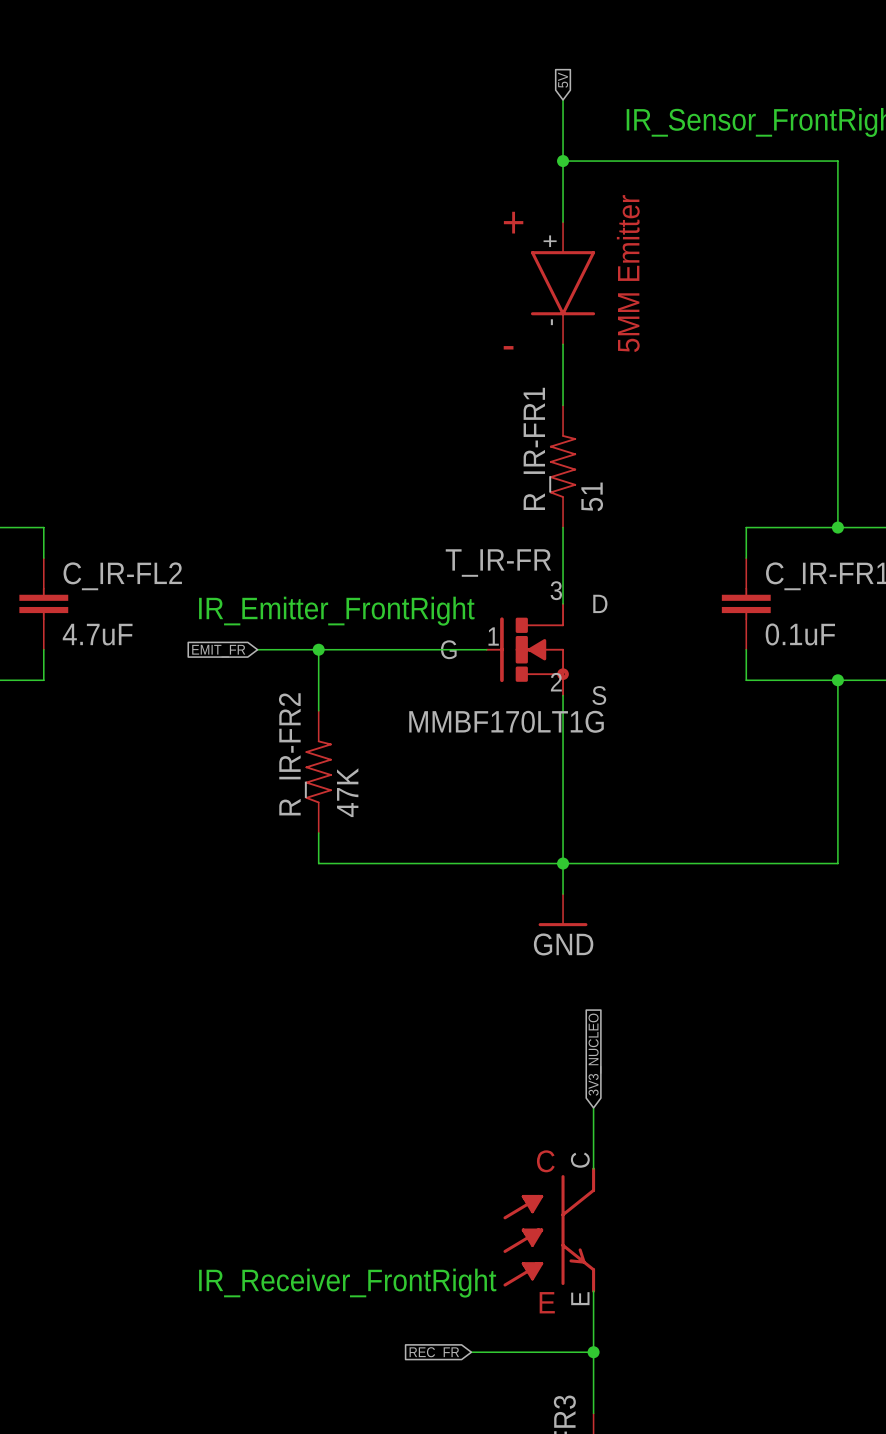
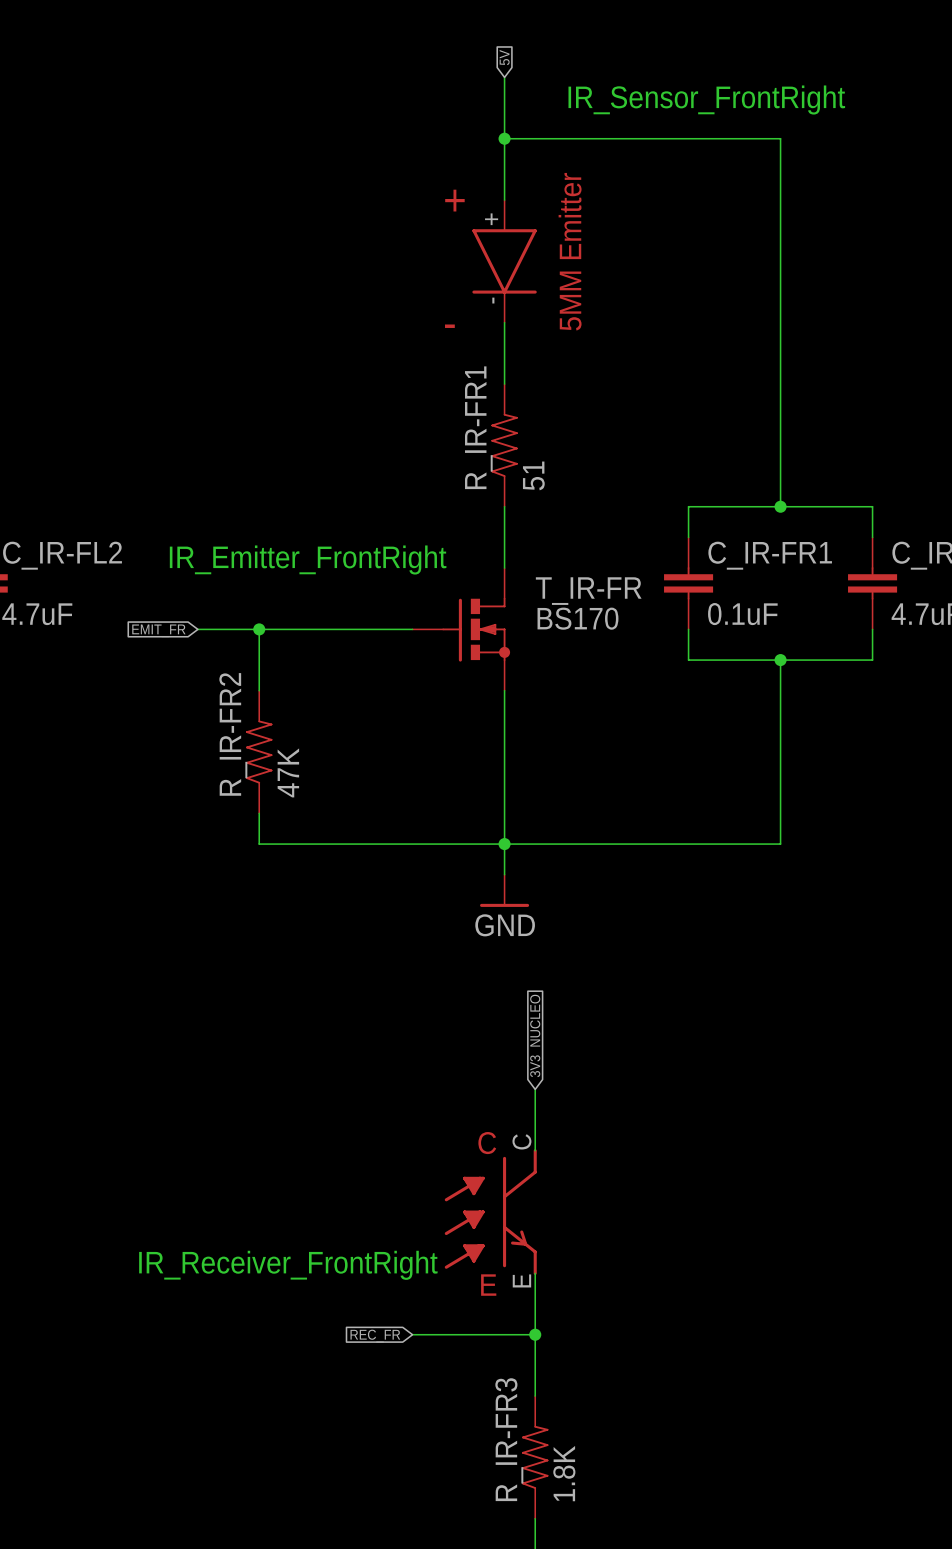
T_IR-FR name position: T_IR-FR (498, 563) -> T_IR-FR (588, 591)
T_IR-FR symbol: [485, 603, 569, 697] -> [412, 568, 511, 691]
text position: IR_Emitter_FrontRight (336, 611) -> IR_Emitter_FrontRight (308, 560)
T_IR-FR value: MMBF170LT1G (506, 721) -> BS170 (577, 618)

